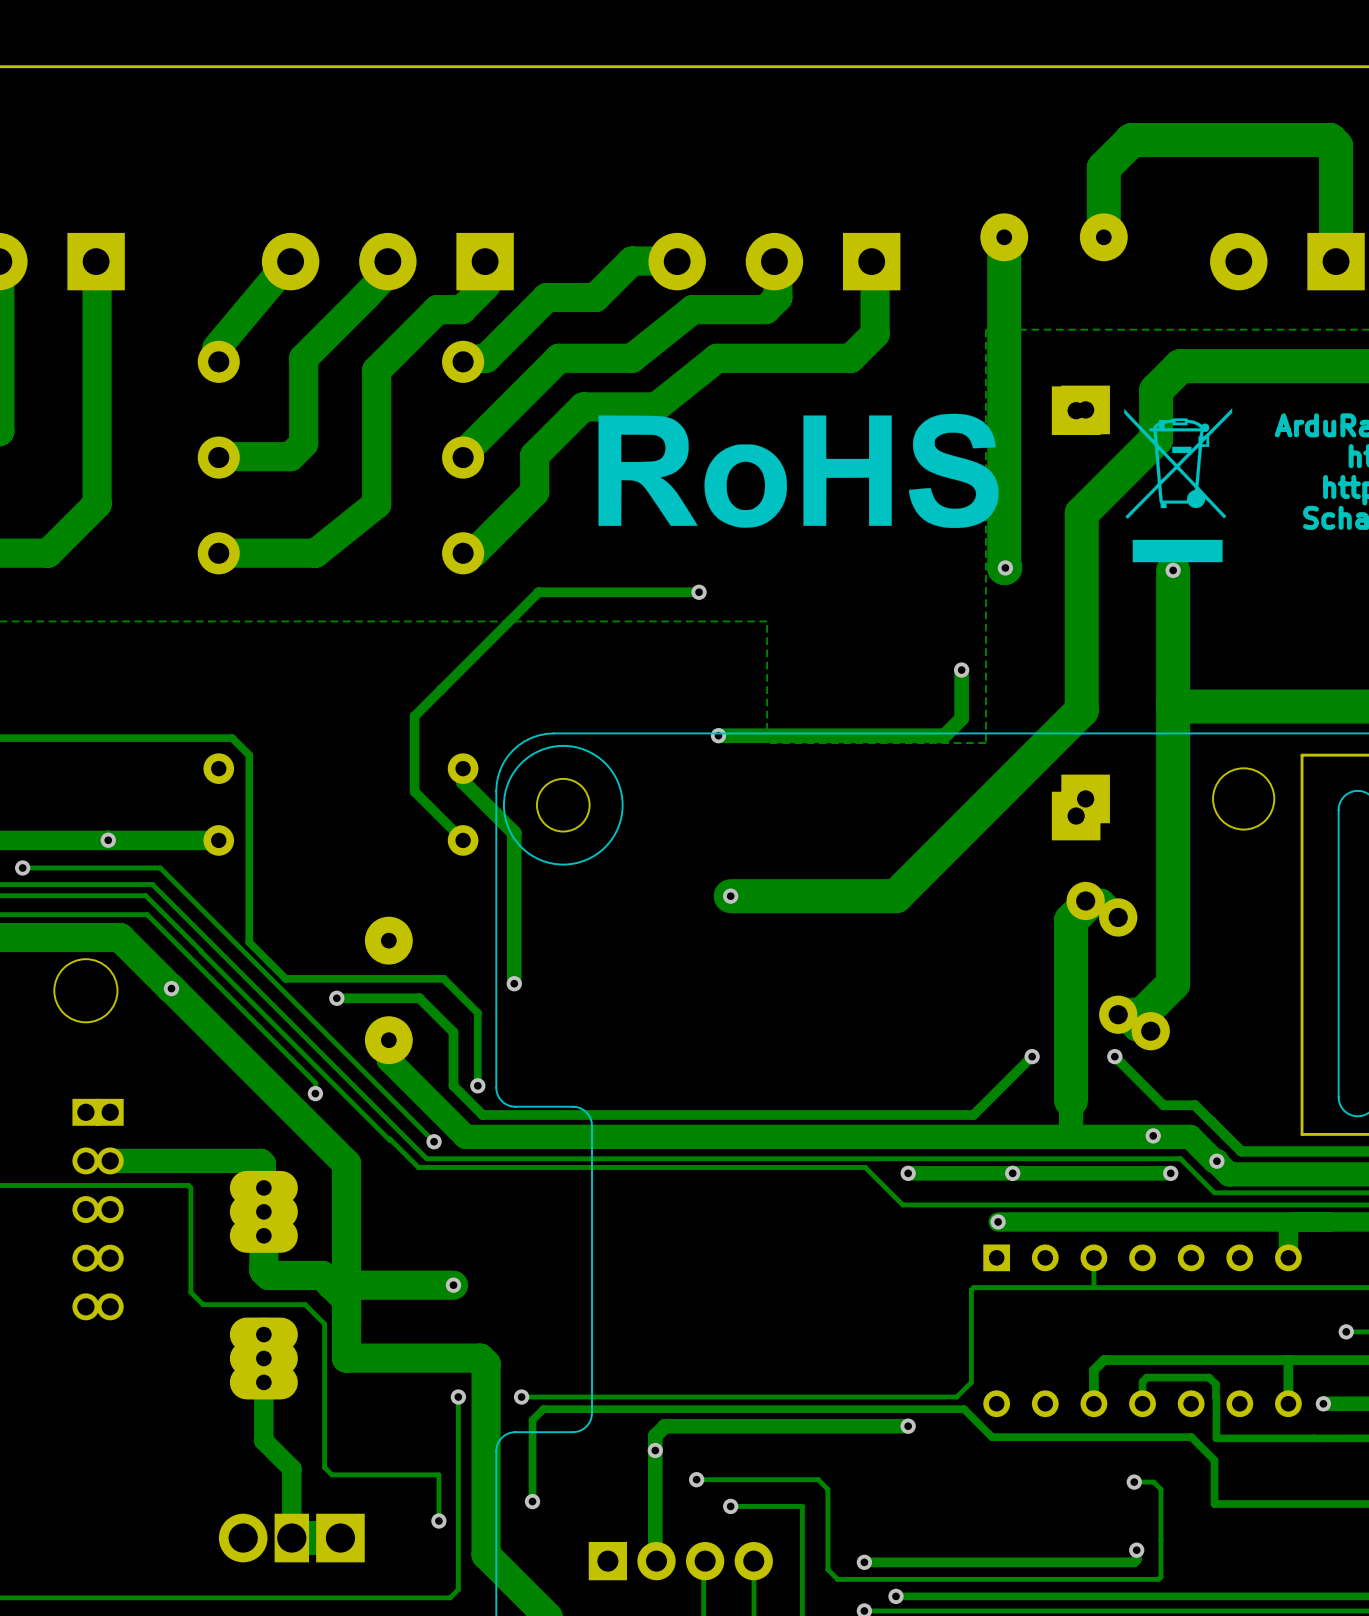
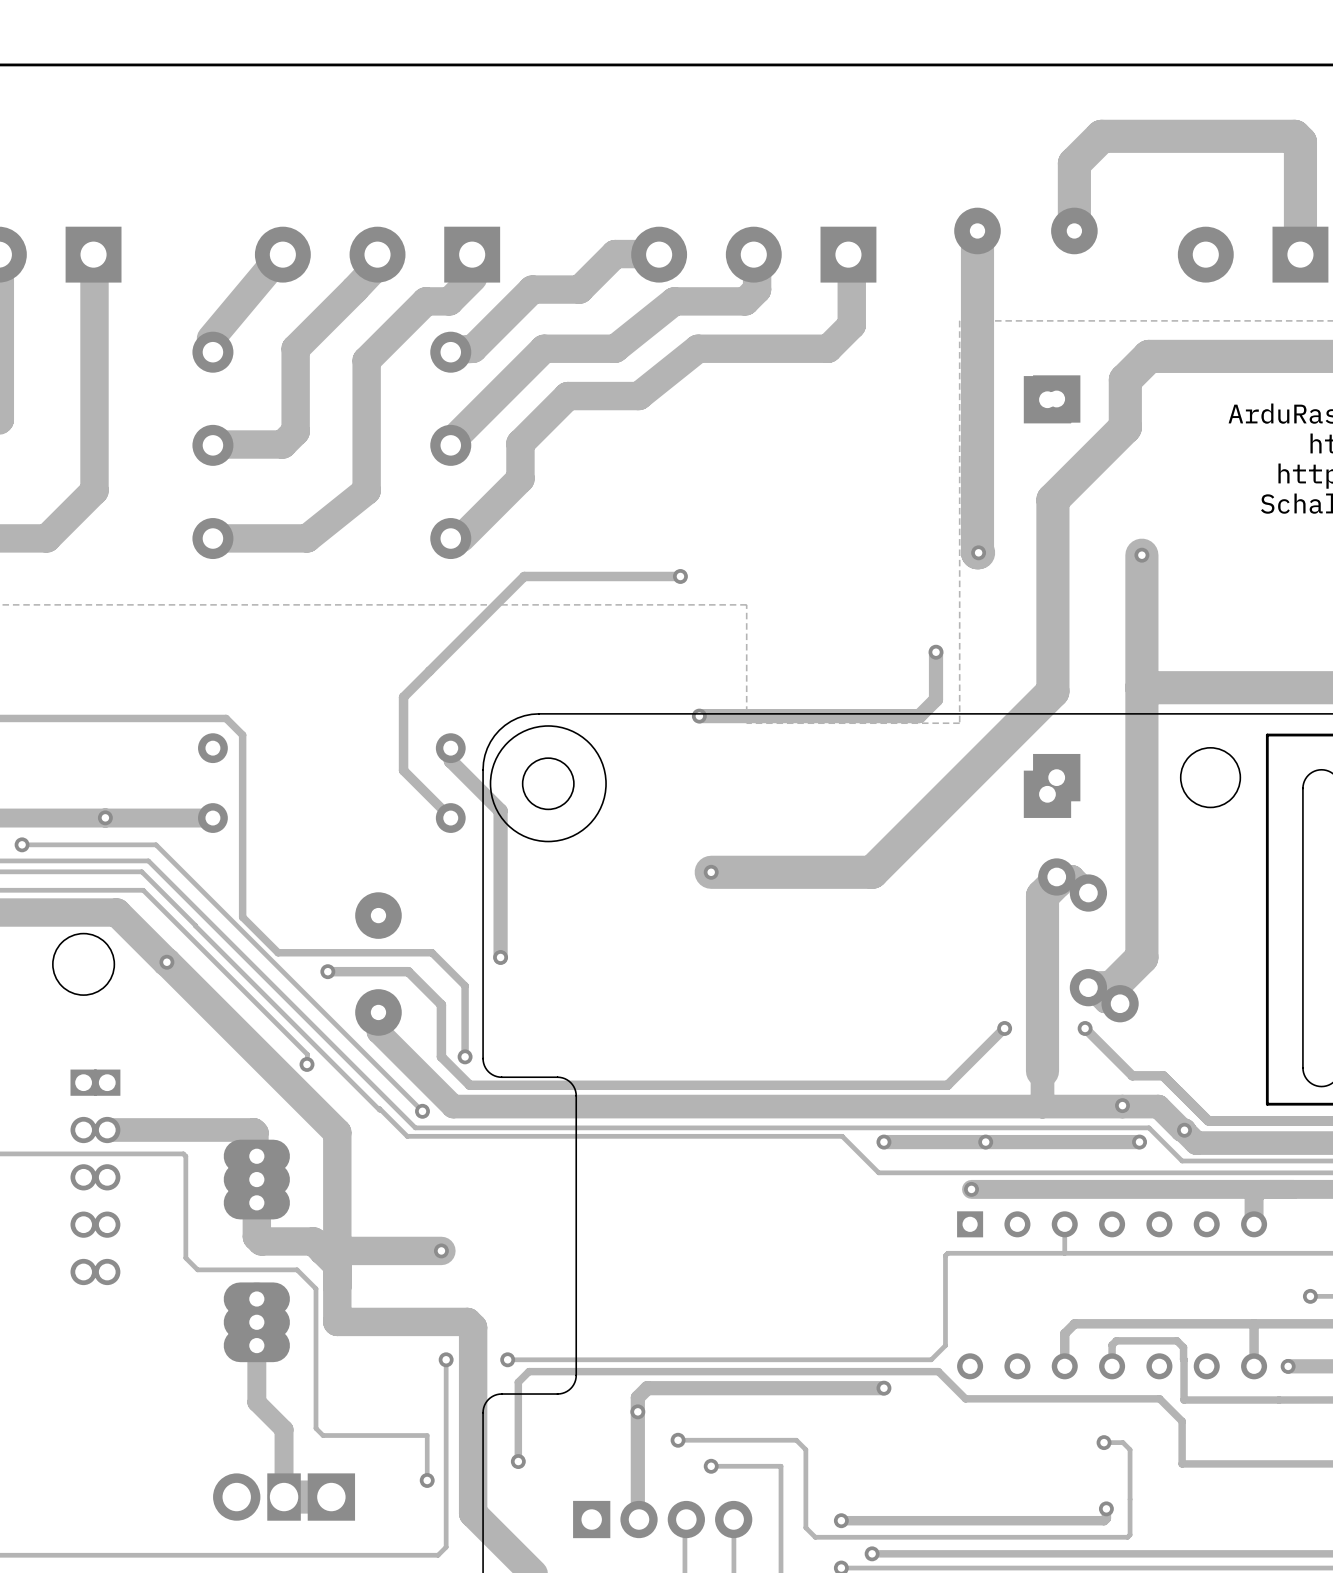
drawing: [1124, 408, 1233, 563] -> none
drawing: [598, 413, 999, 529] -> none

